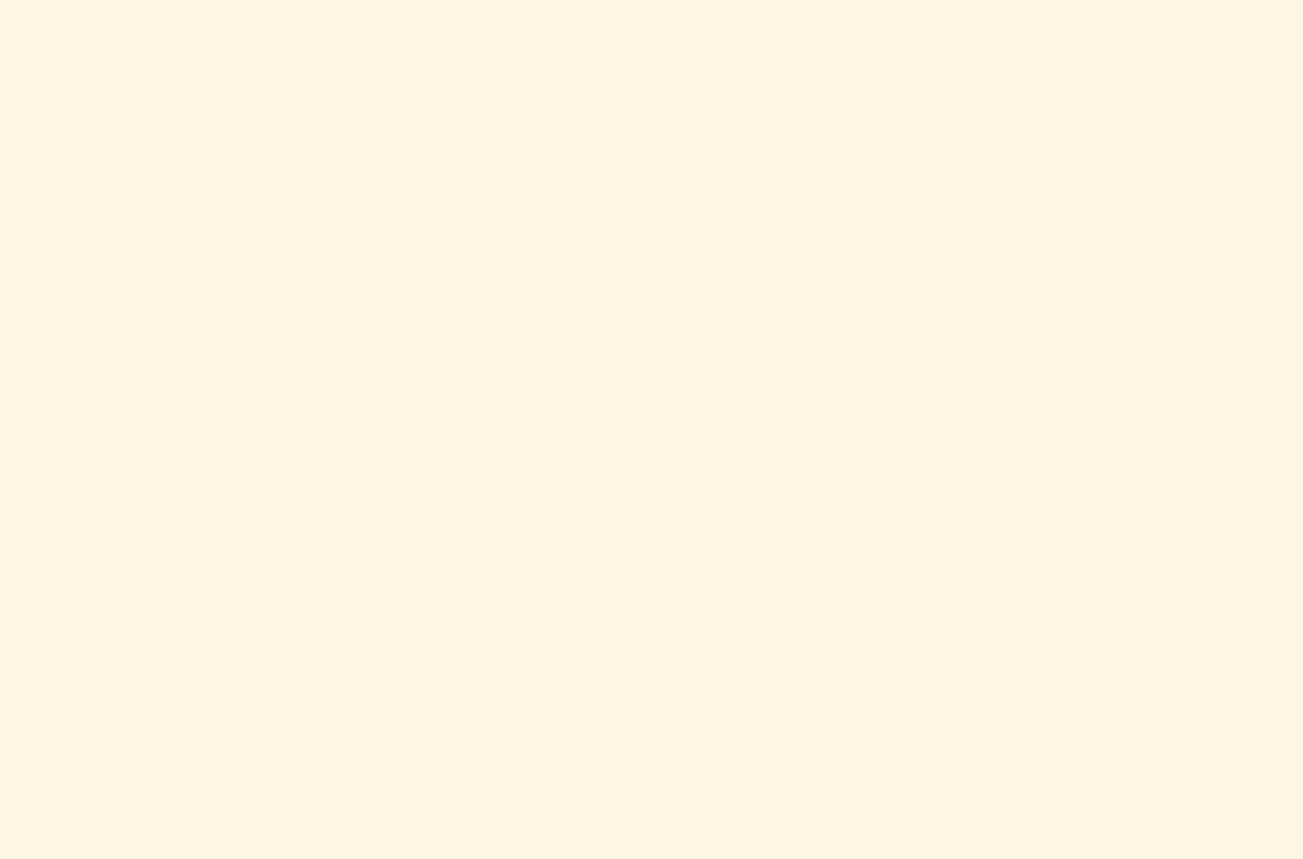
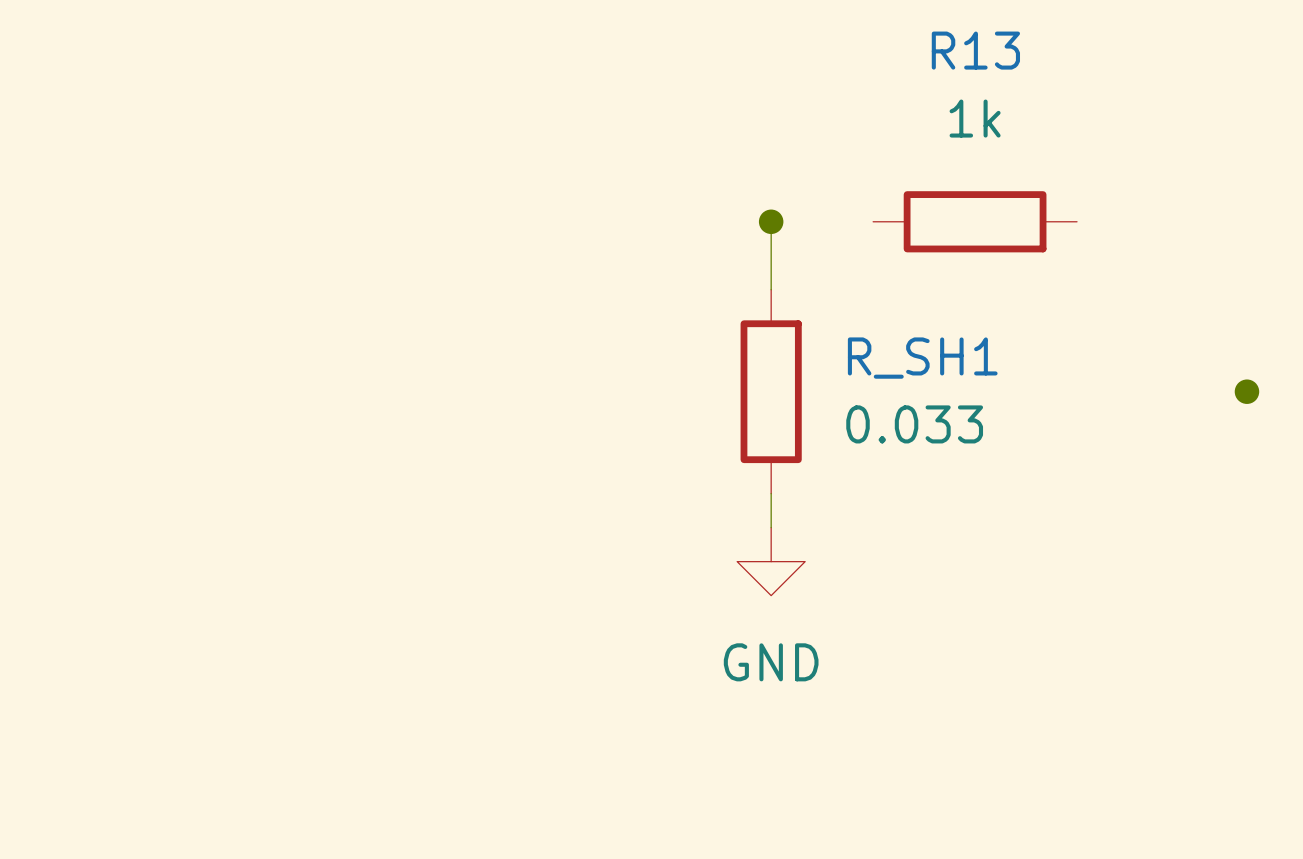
wire: none -> (771, 221) (771, 289)
junction: none -> (771, 221)
R13: none -> 1k (975, 221)
R_SH1: none -> 0.033 (771, 391)
junction: none -> (1246, 391)
wire: none -> (771, 493) (771, 527)
power symbol: none -> GND (771, 561)

